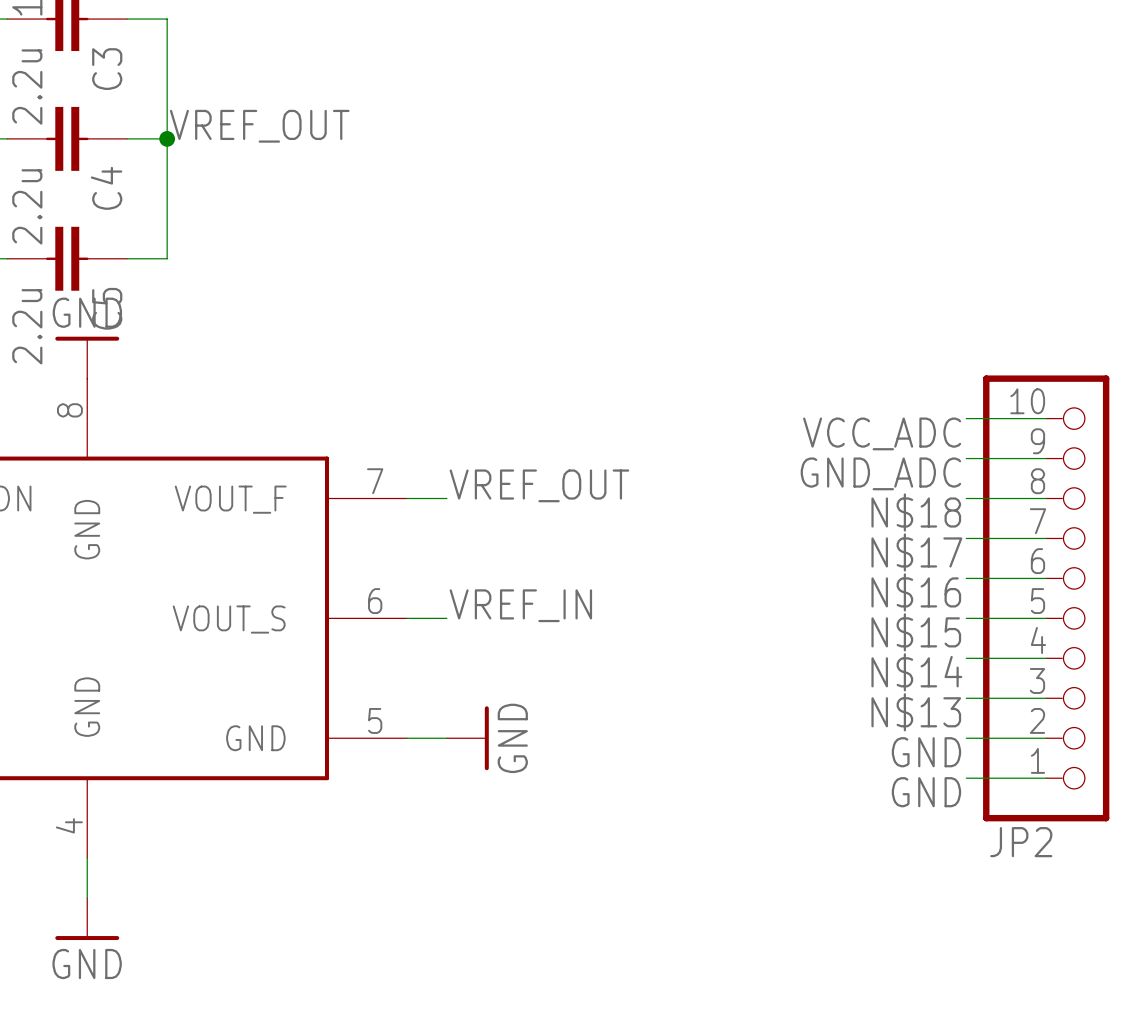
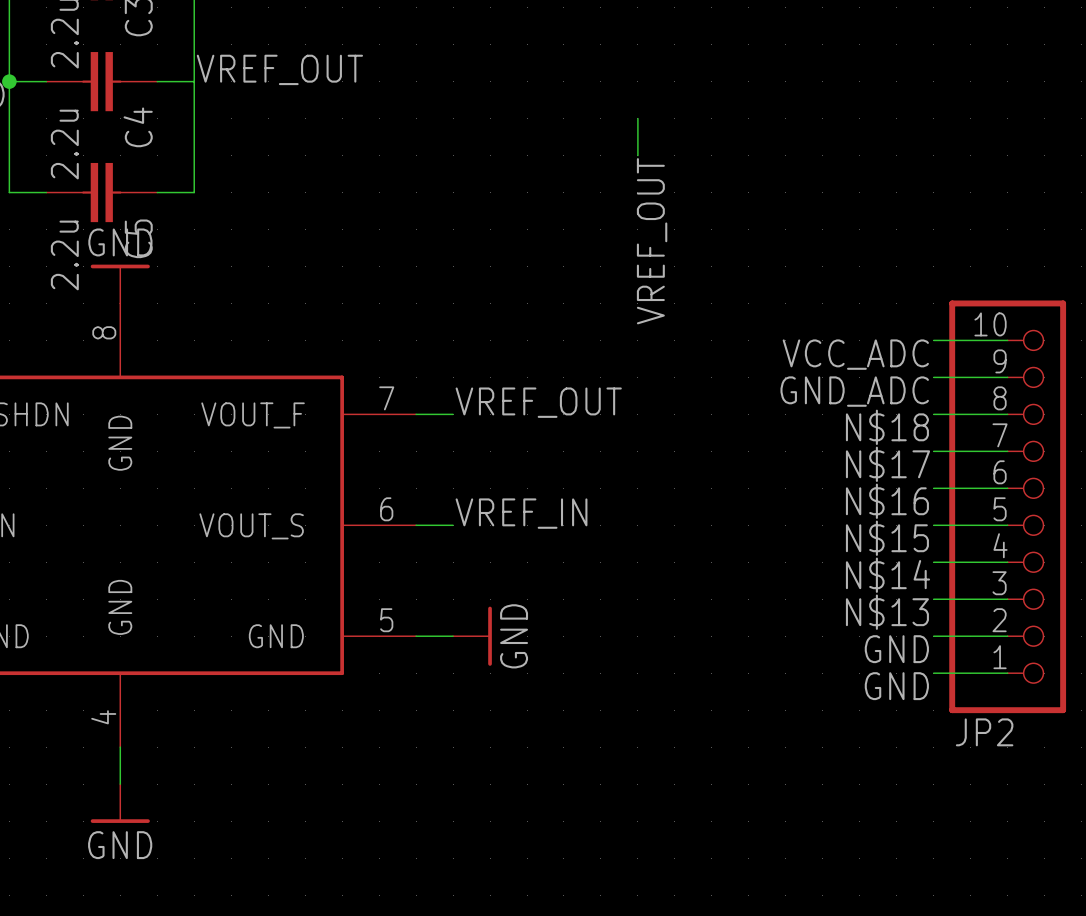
junction: (167, 138) -> none
wire: none -> (637, 118) (637, 155)
label: none -> VREF_OUT (652, 241)

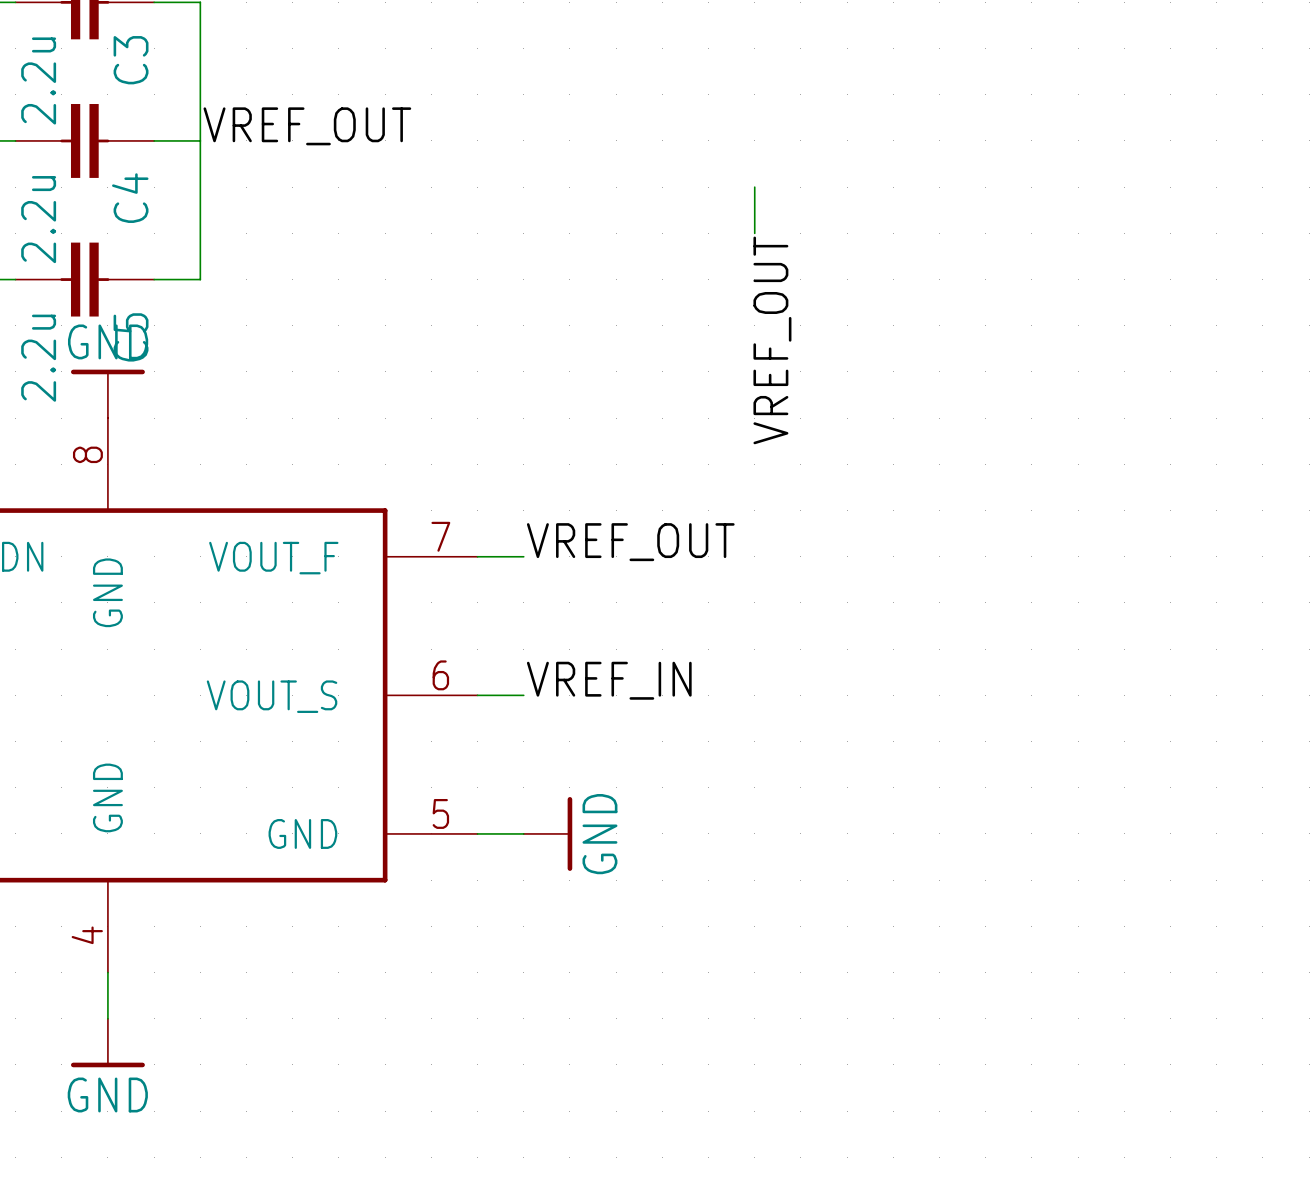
wire: (933, 340) (1007, 340) -> none
label: VCC_ADC (855, 354) -> none
wire: (933, 377) (1007, 377) -> none
label: GND_ADC (854, 391) -> none
wire: (933, 414) (1007, 414) -> none
label: N$18 (887, 427) -> none
wire: (933, 451) (1007, 451) -> none
label: N$17 (887, 464) -> none
wire: (933, 488) (1007, 488) -> none
label: N$16 (887, 501) -> none
JP2: (1007, 506) -> none
wire: (933, 525) (1007, 525) -> none
label: N$15 (887, 538) -> none
wire: (933, 562) (1007, 562) -> none
label: N$14 (887, 575) -> none
wire: (933, 599) (1007, 599) -> none
label: N$13 (887, 612) -> none
wire: (933, 636) (1007, 636) -> none
label: GND (896, 649) -> none
wire: (933, 673) (1007, 673) -> none
label: GND (896, 686) -> none

